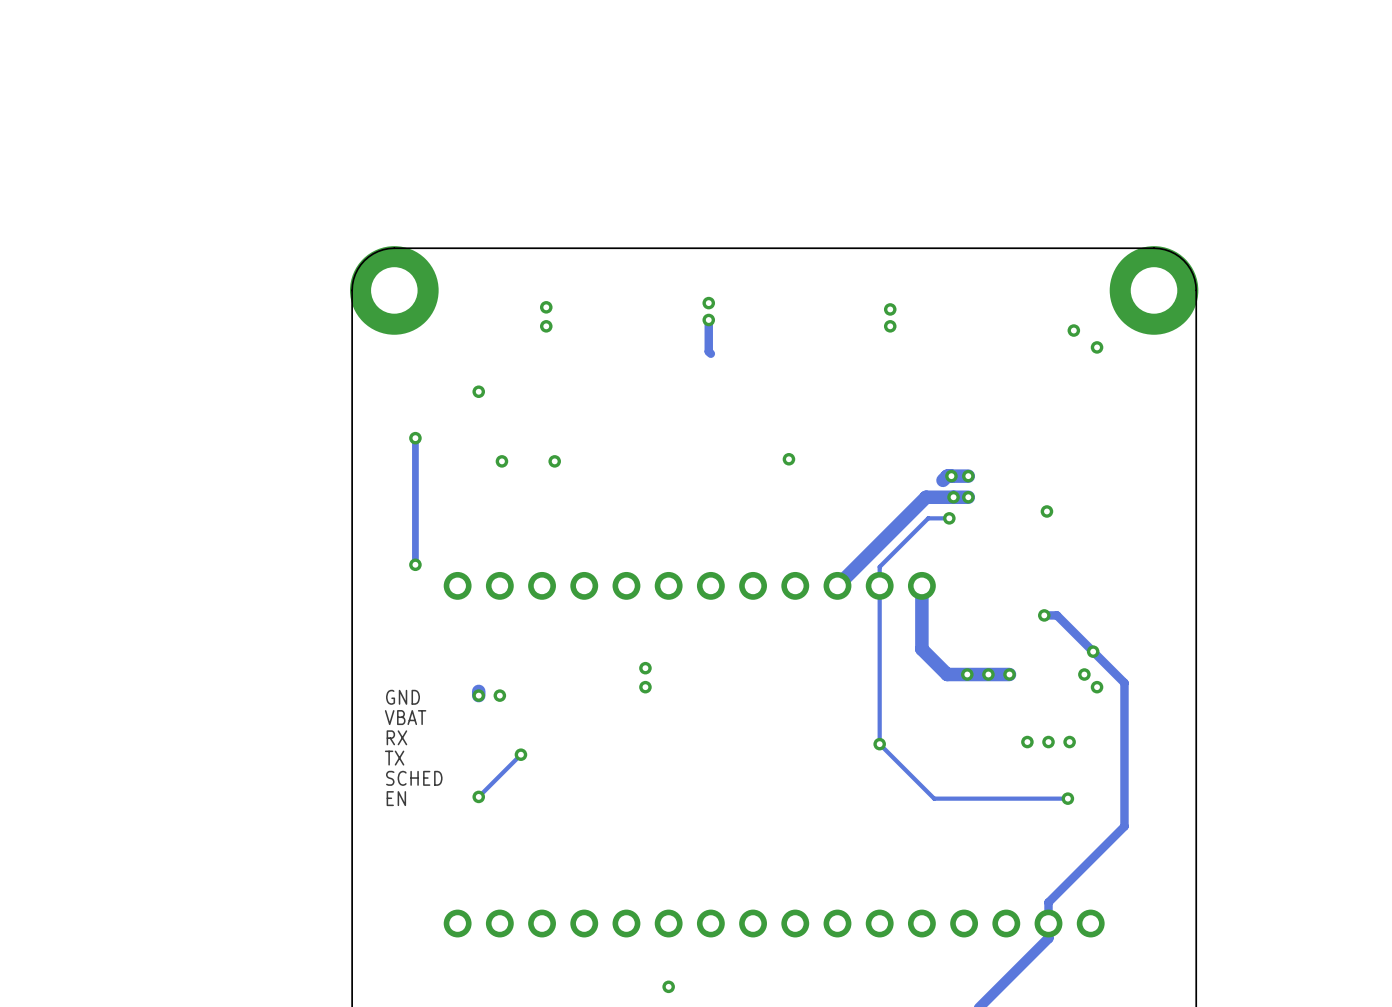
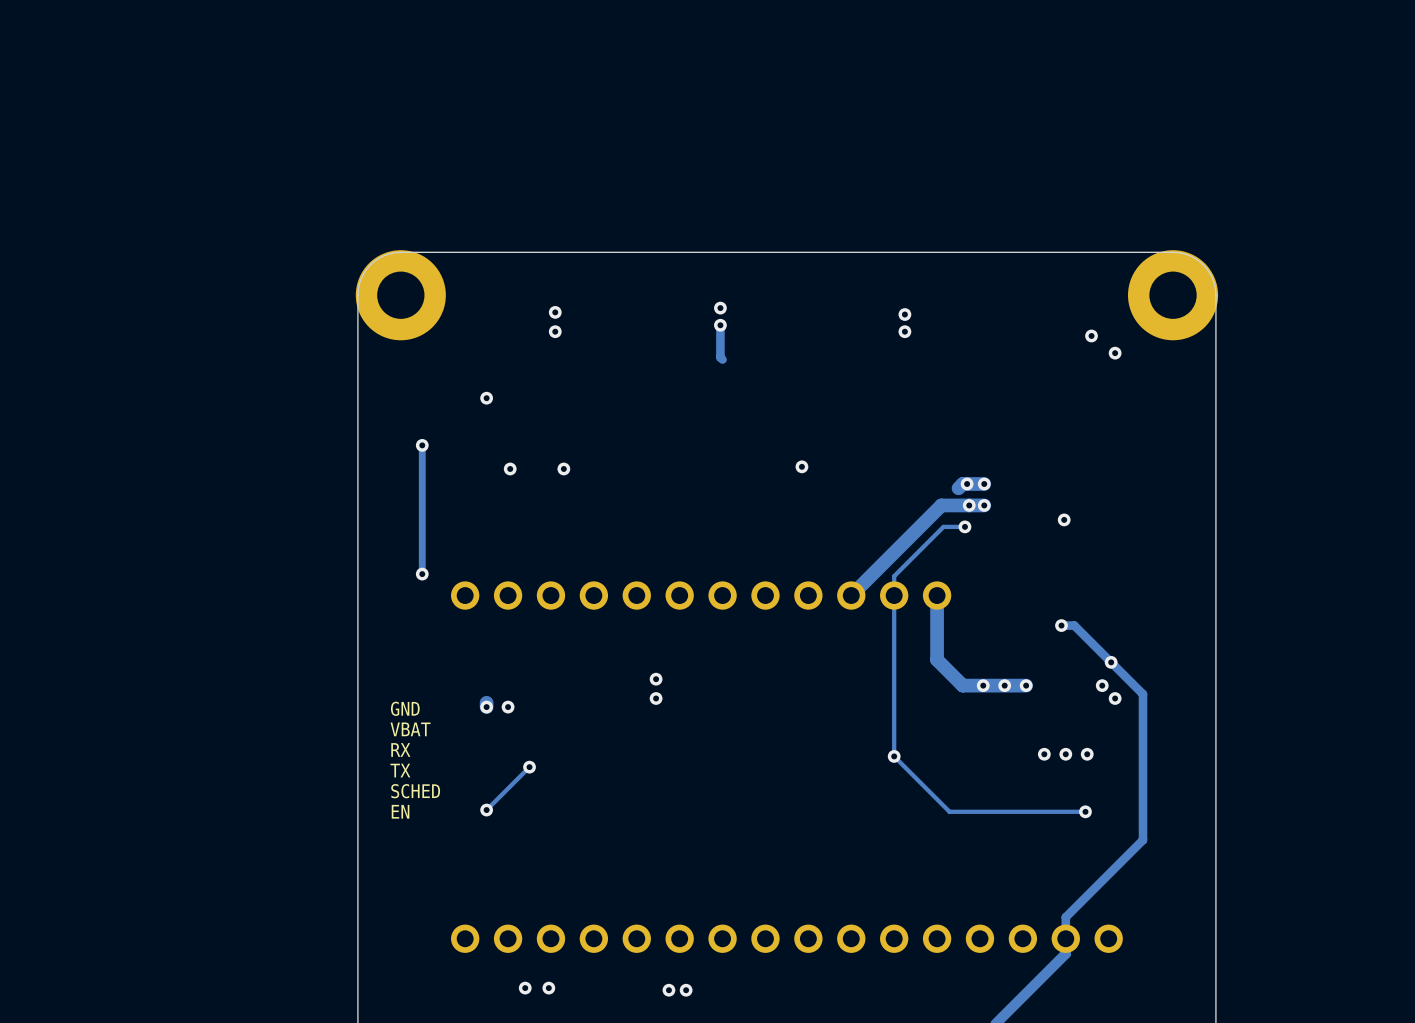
via: none -> (525, 988)
via: none -> (548, 988)
via: none -> (668, 990)
via: none -> (686, 990)
via: (668, 986) -> none

